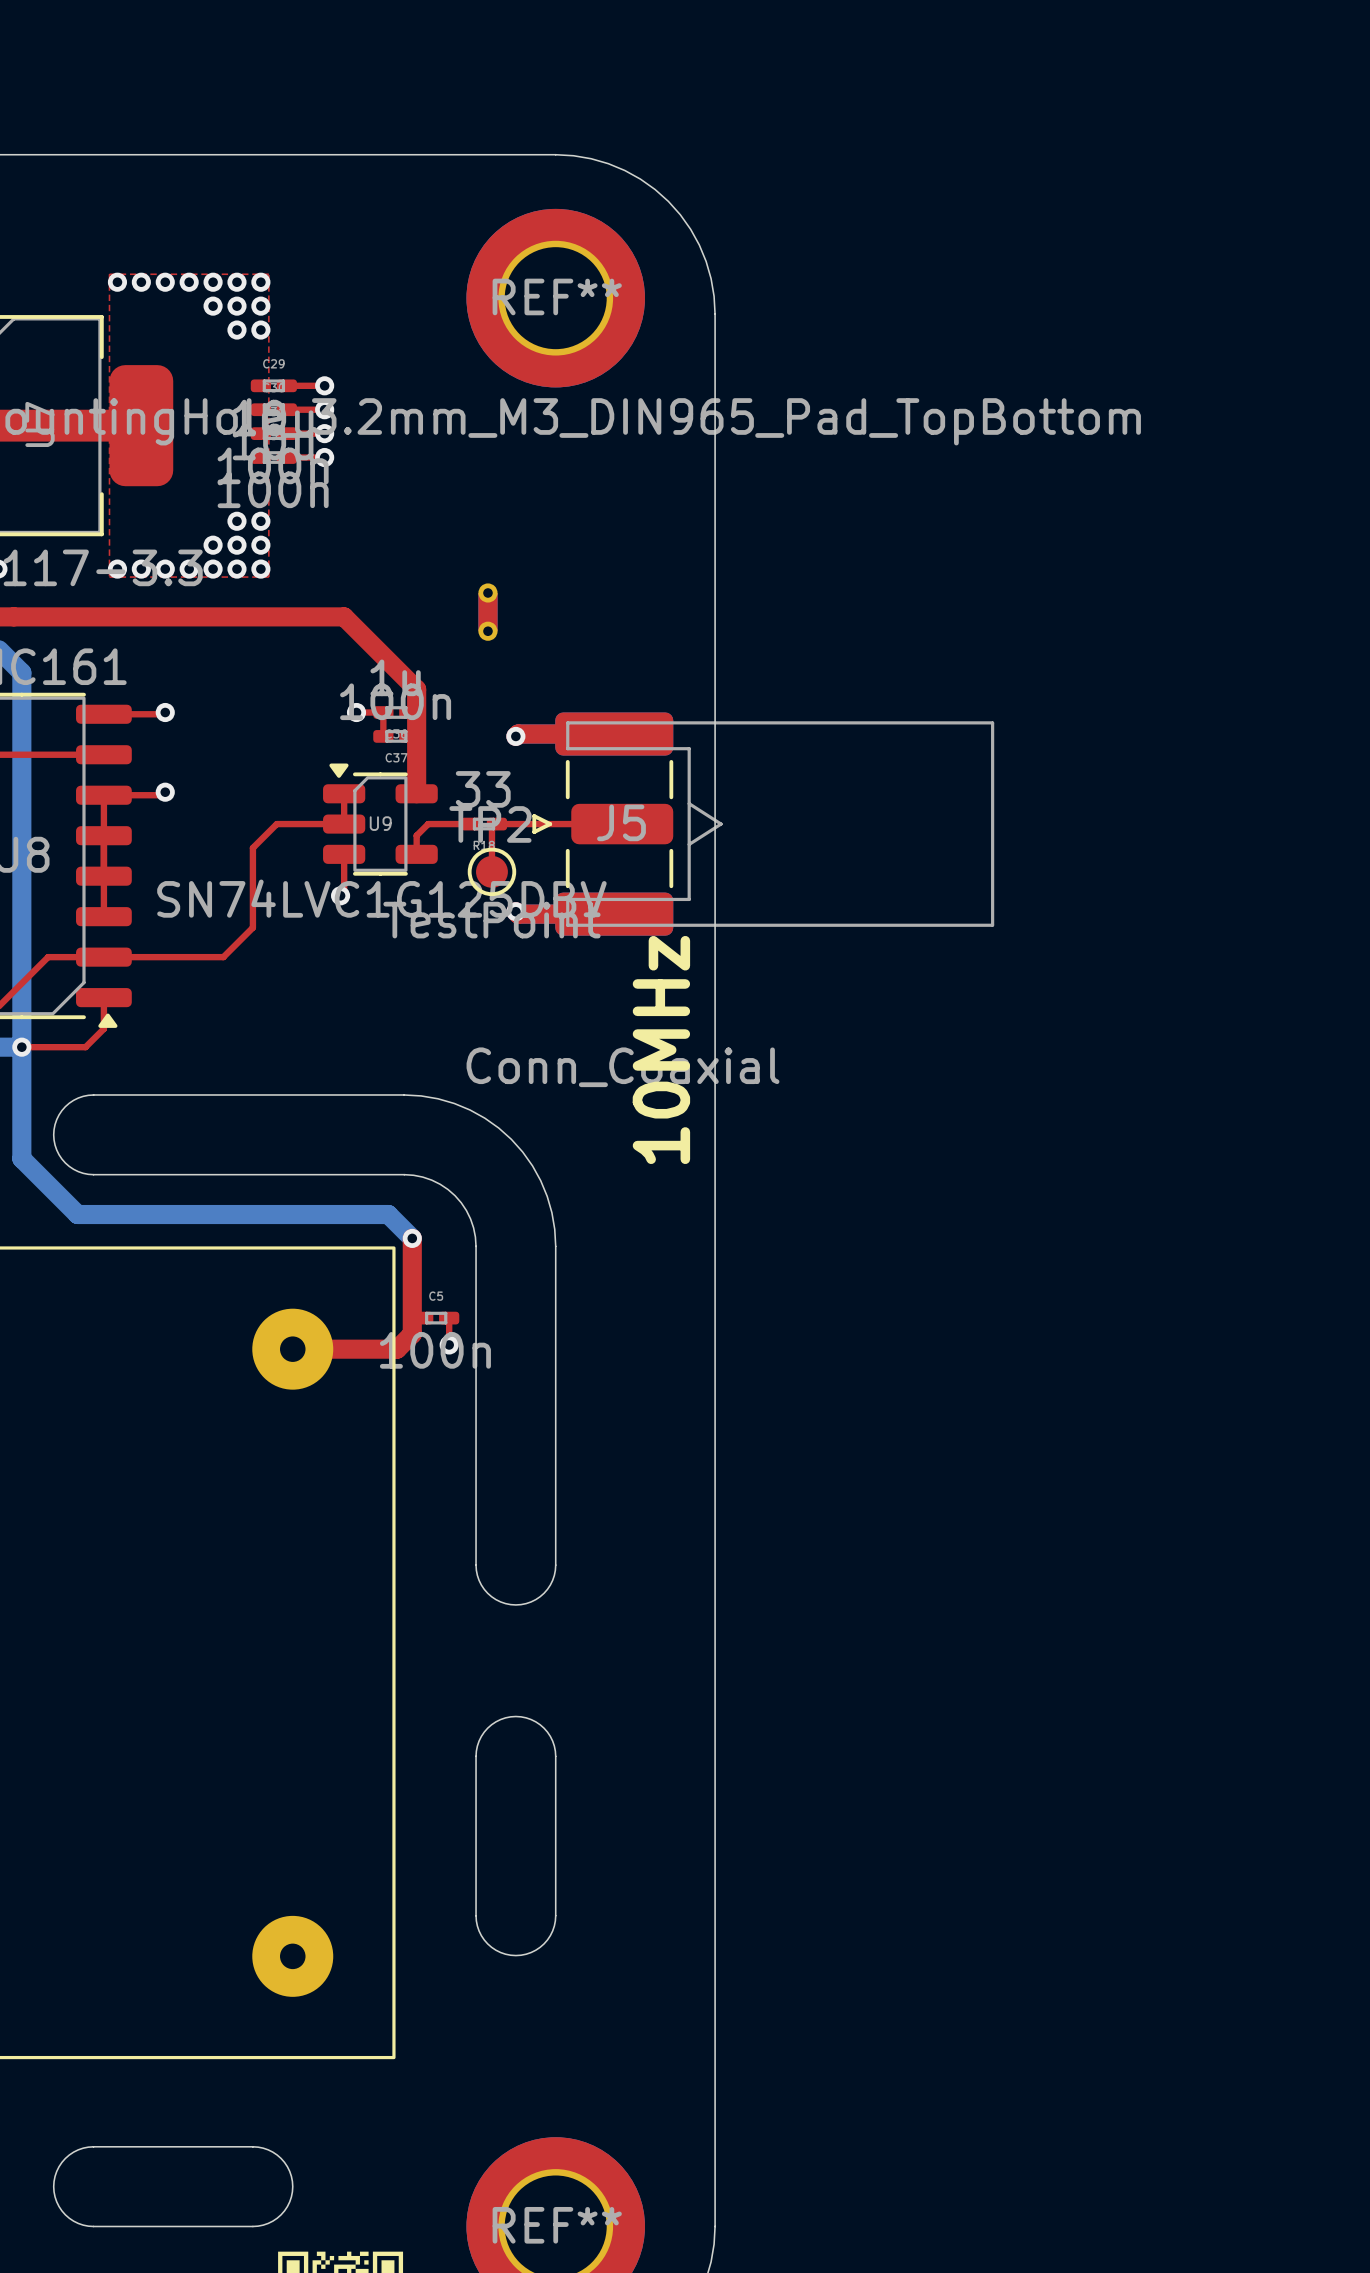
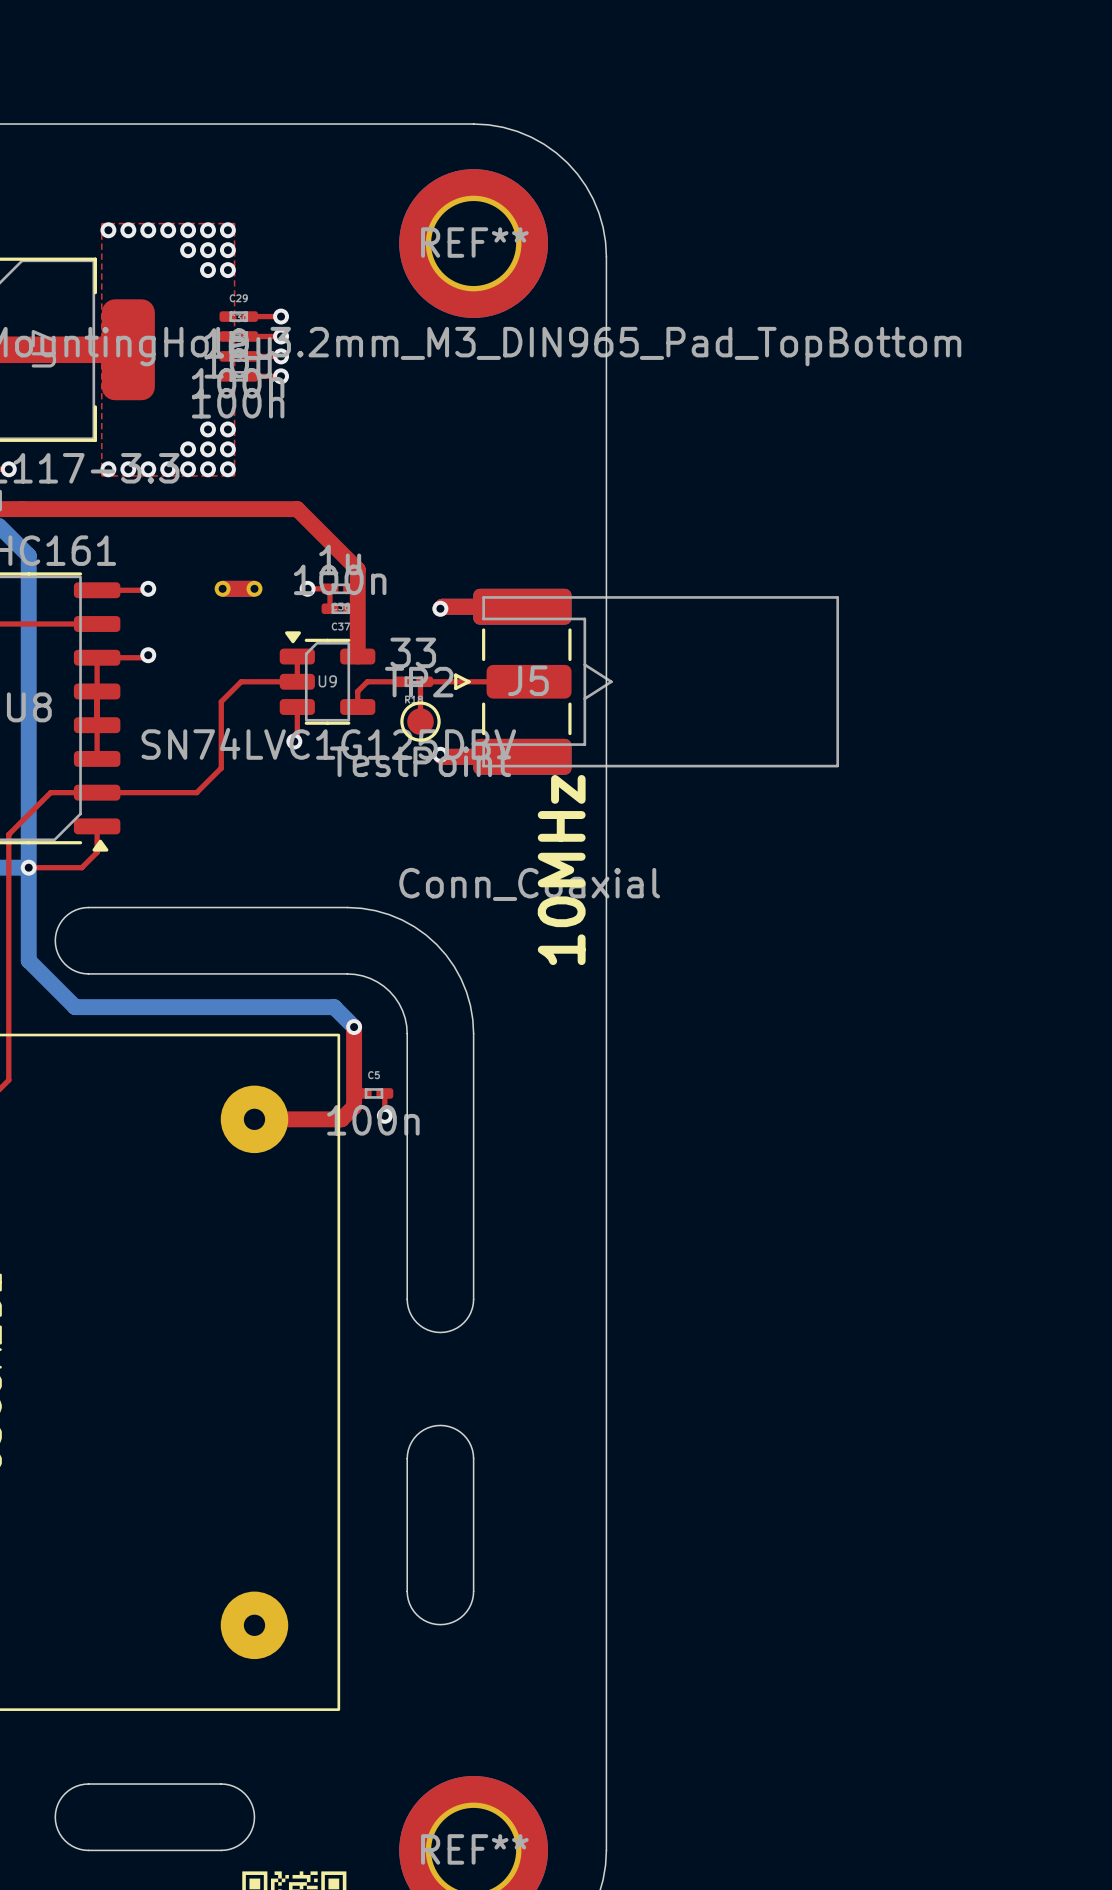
part rotation: 0° (487, 612) -> 90° clockwise (238, 588)
part position: (487, 612) -> (238, 588)

